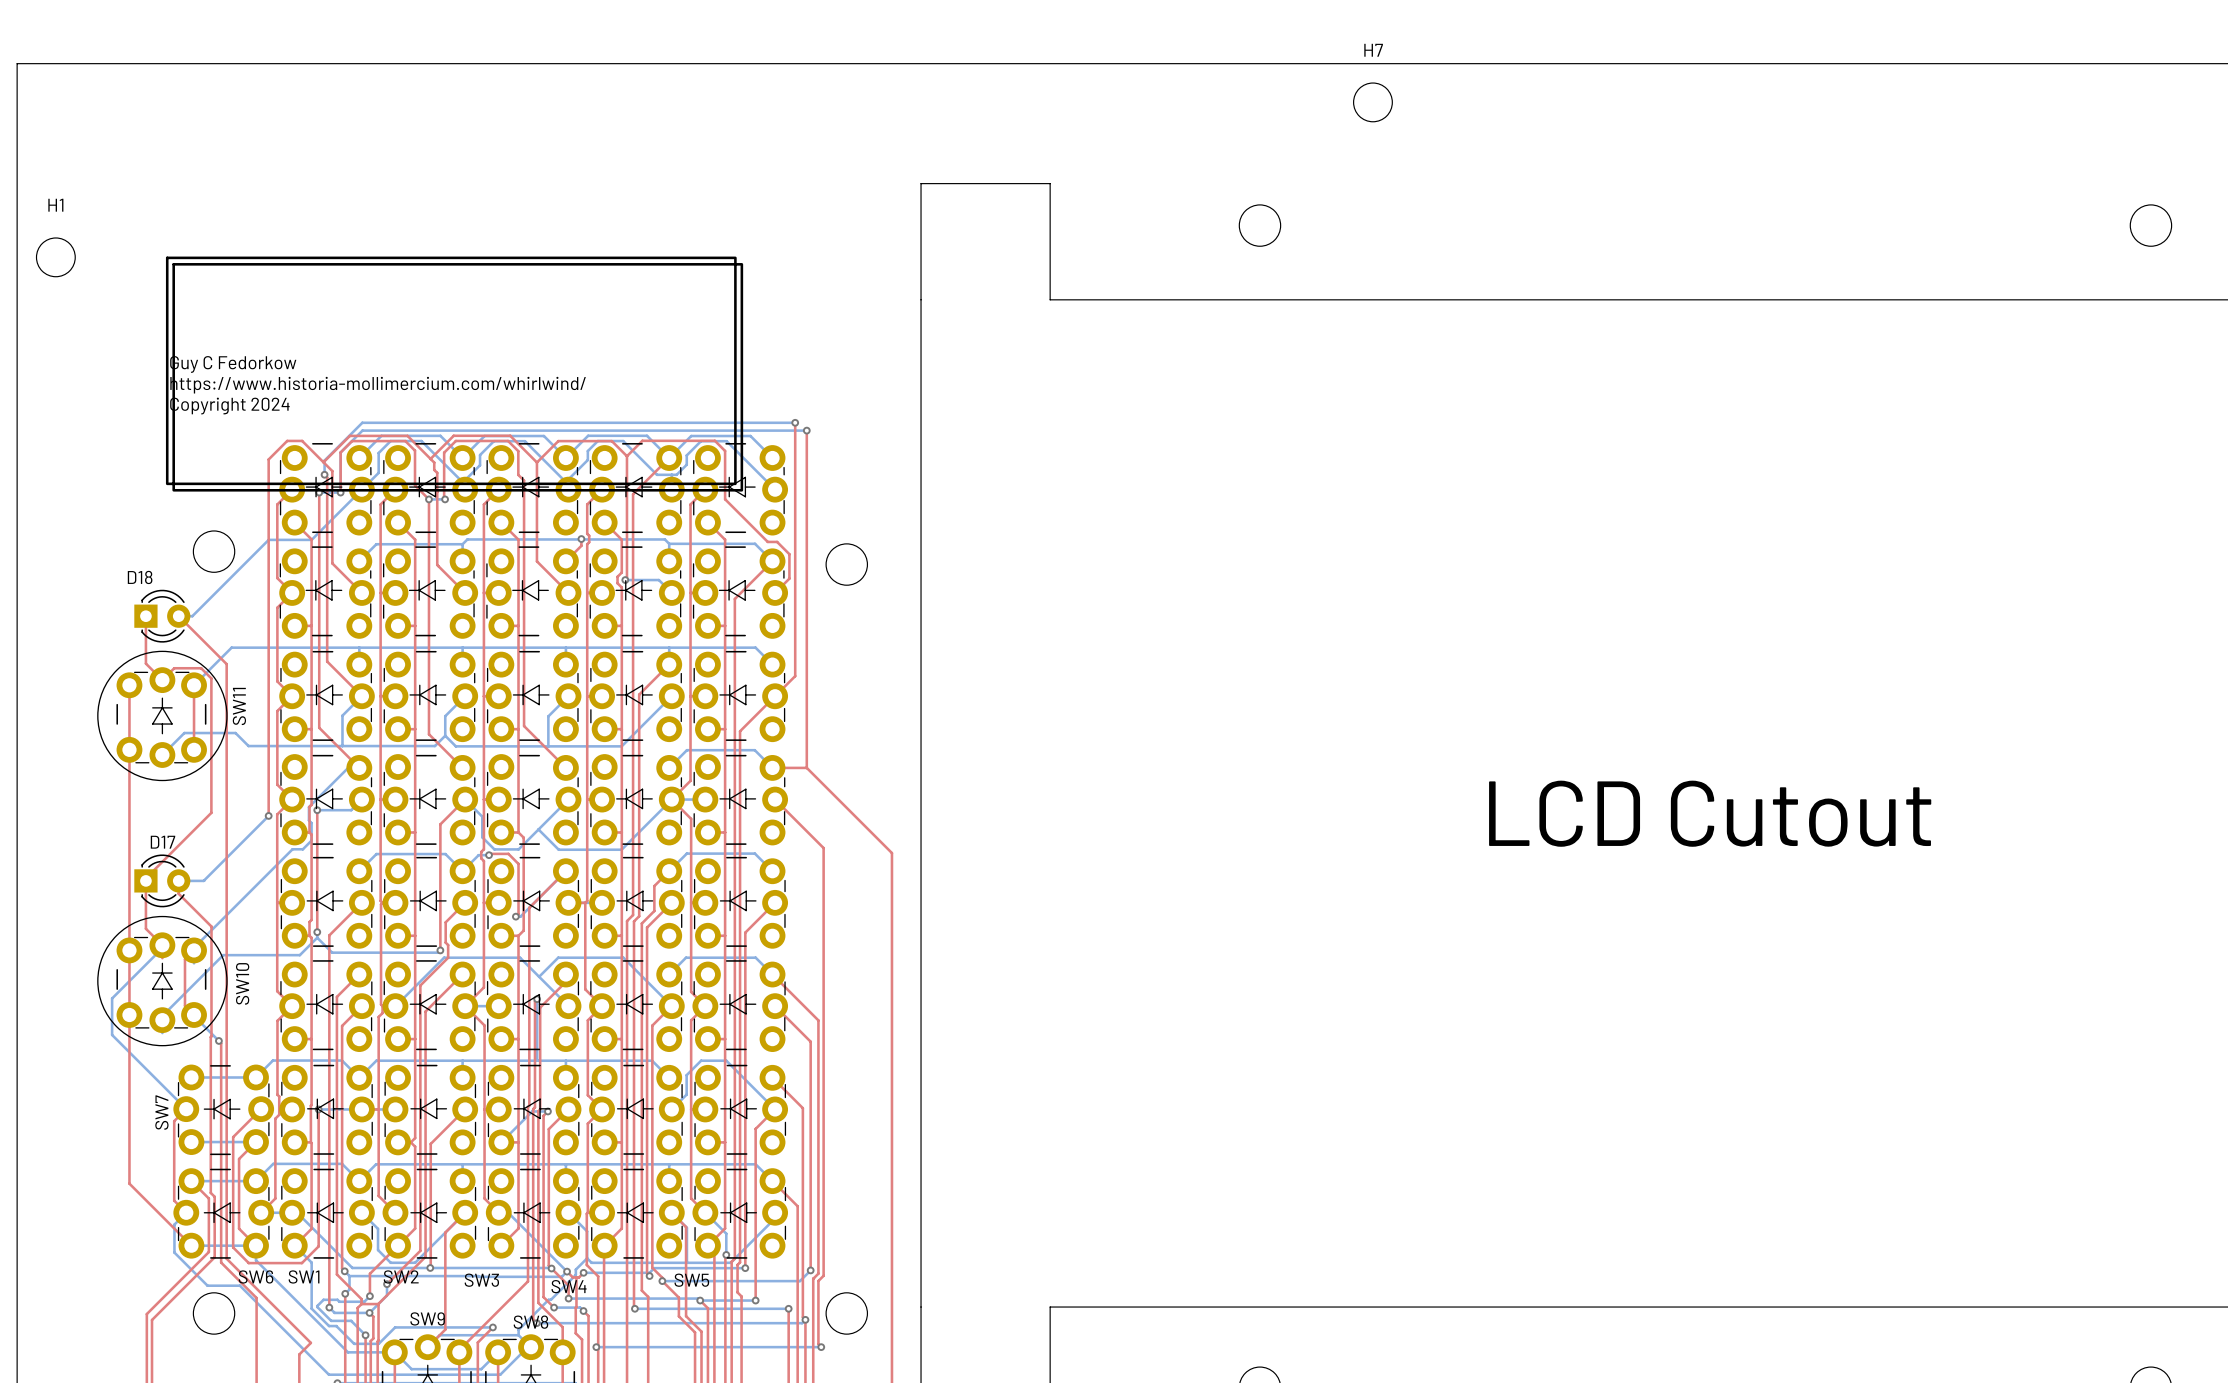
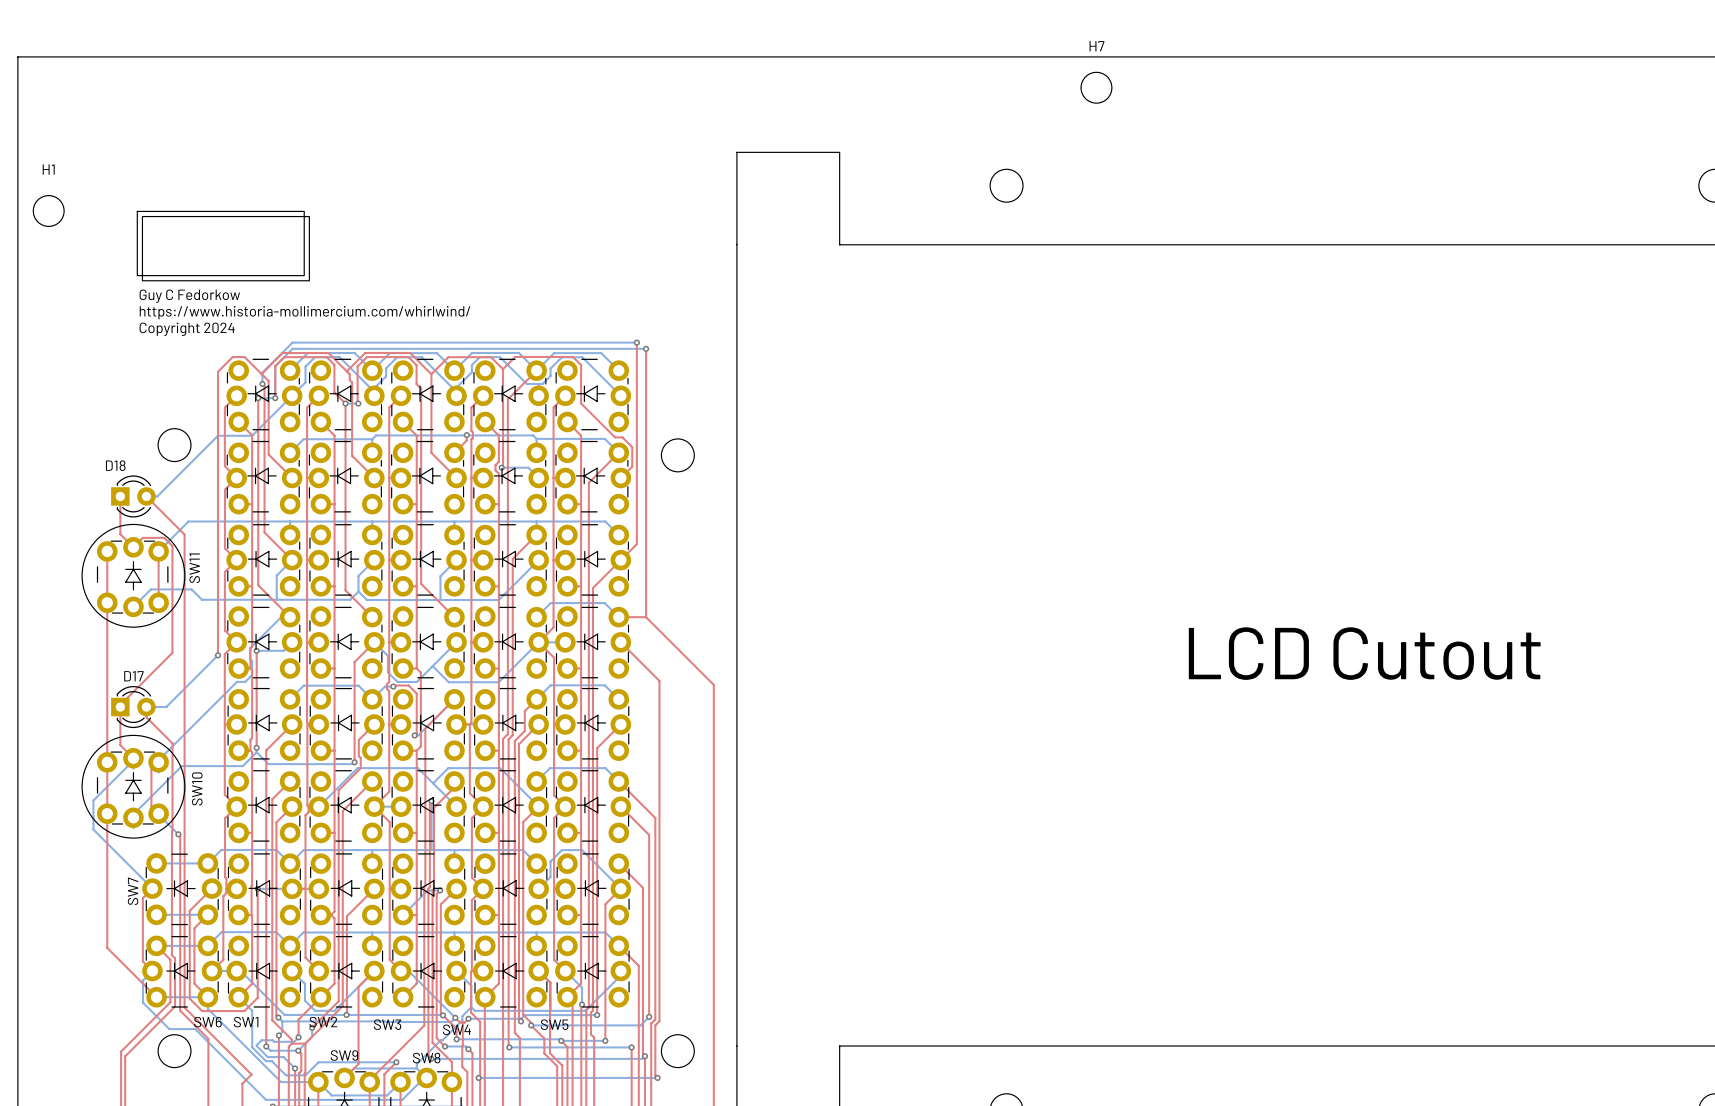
drawing: [165, 256, 744, 492] -> none
drawing: none -> [136, 210, 310, 282]

